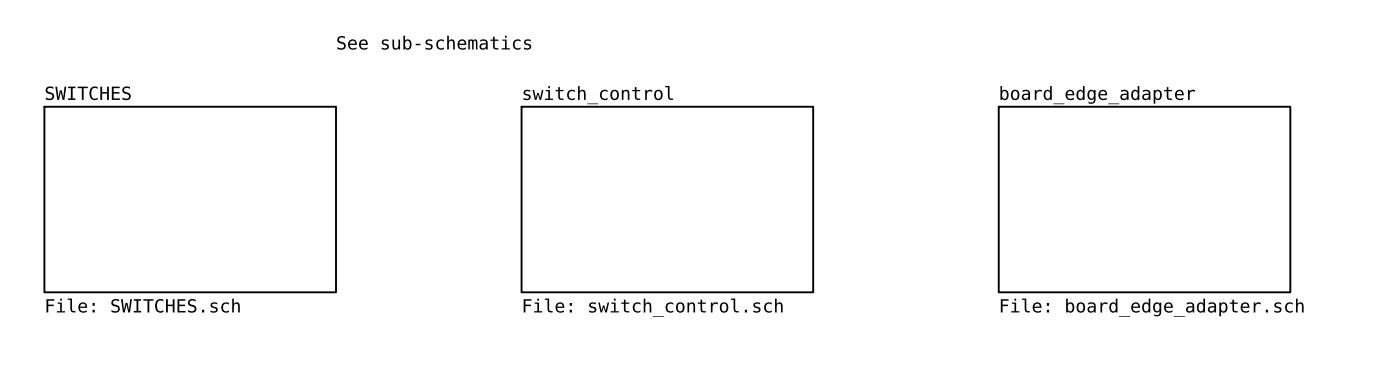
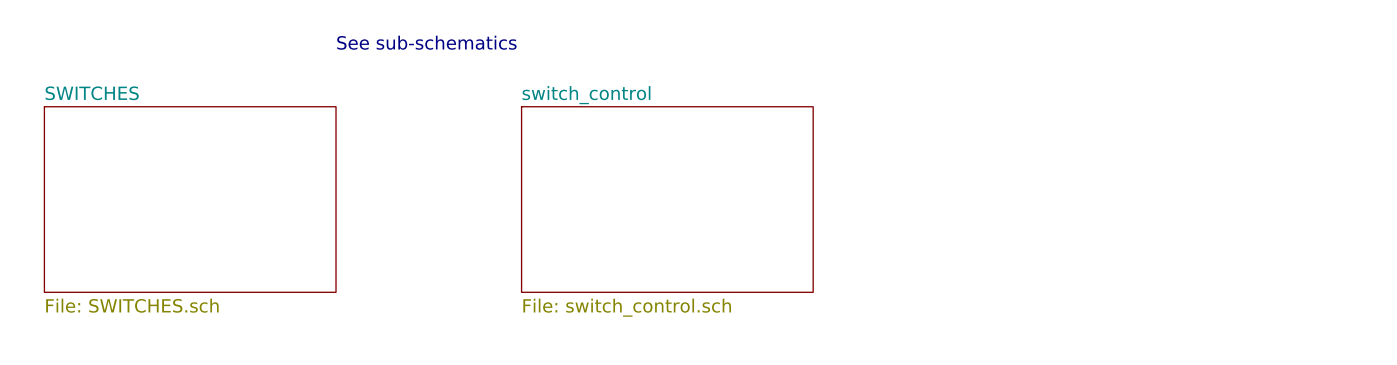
sheet board_edge_adapter: File: board_edge_adapter.sch (1144, 199) -> none

